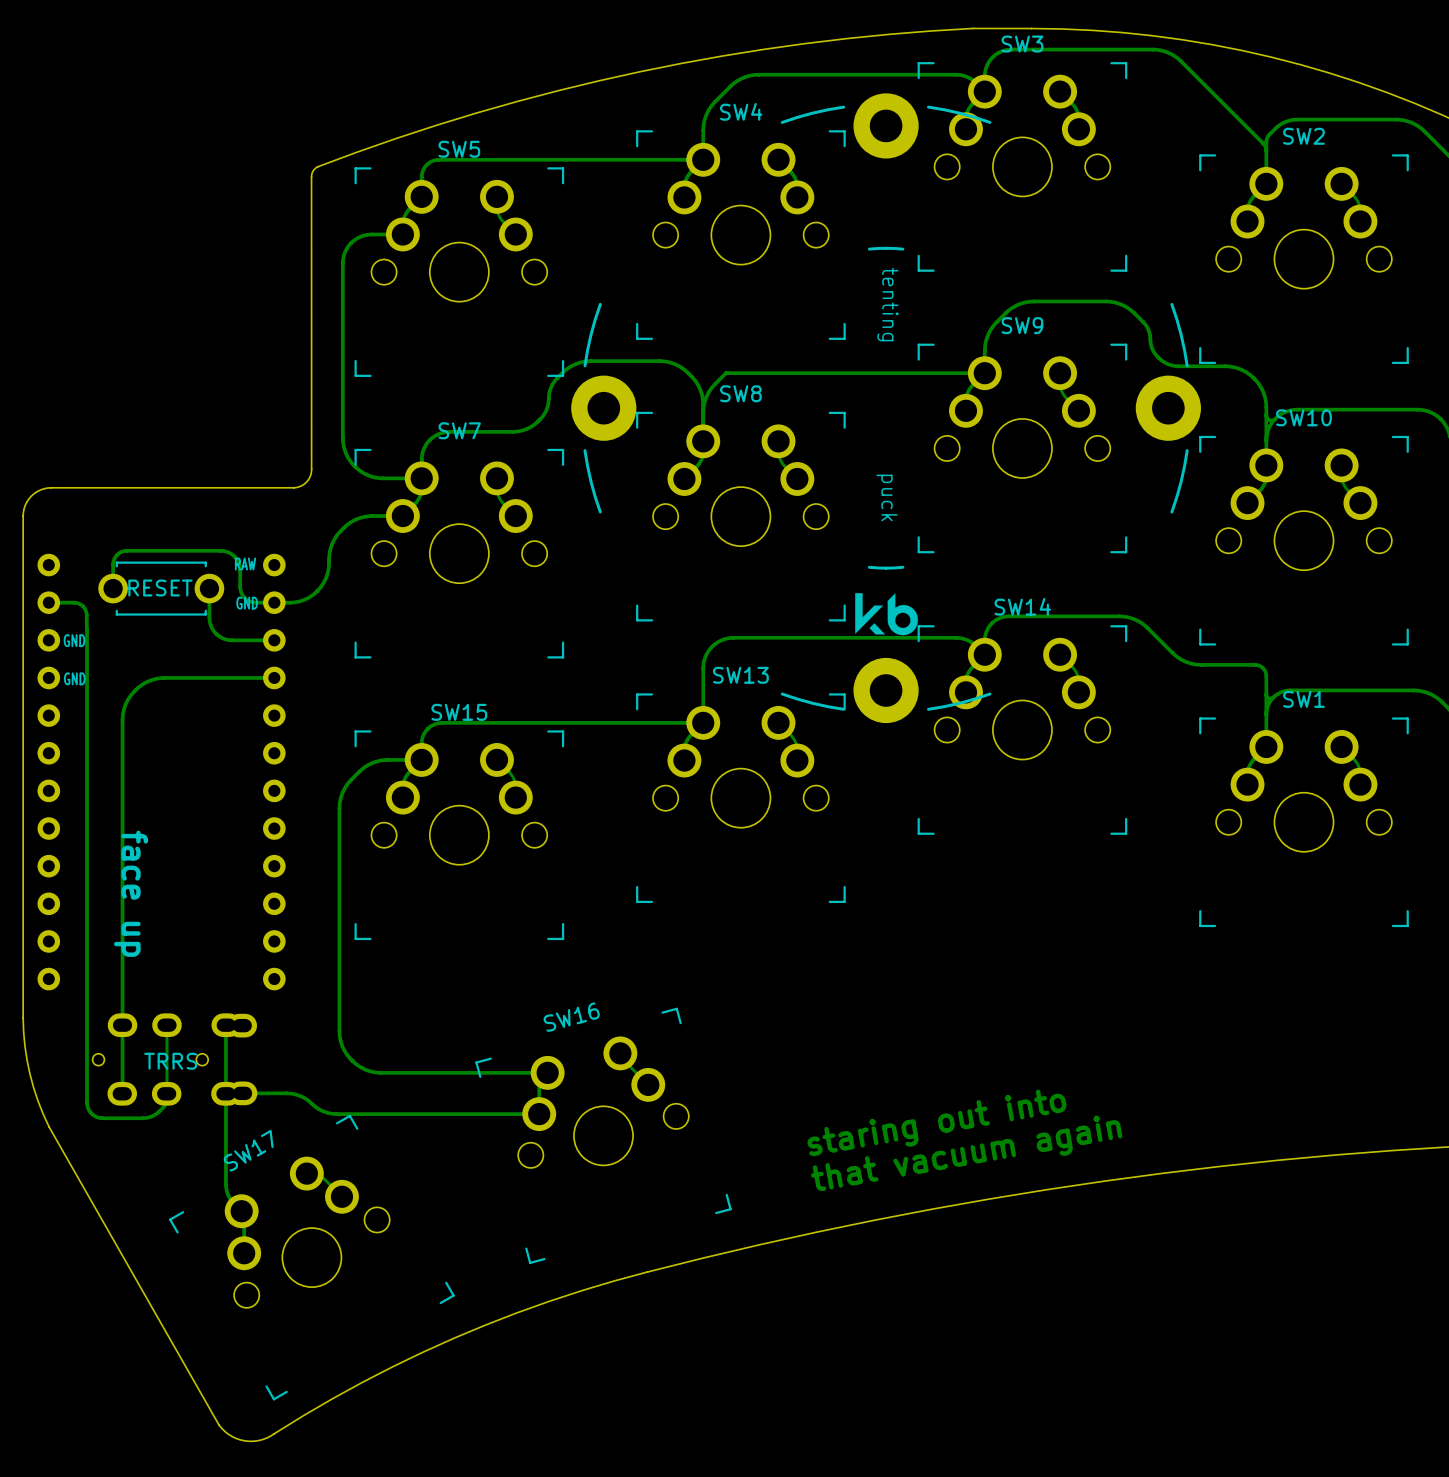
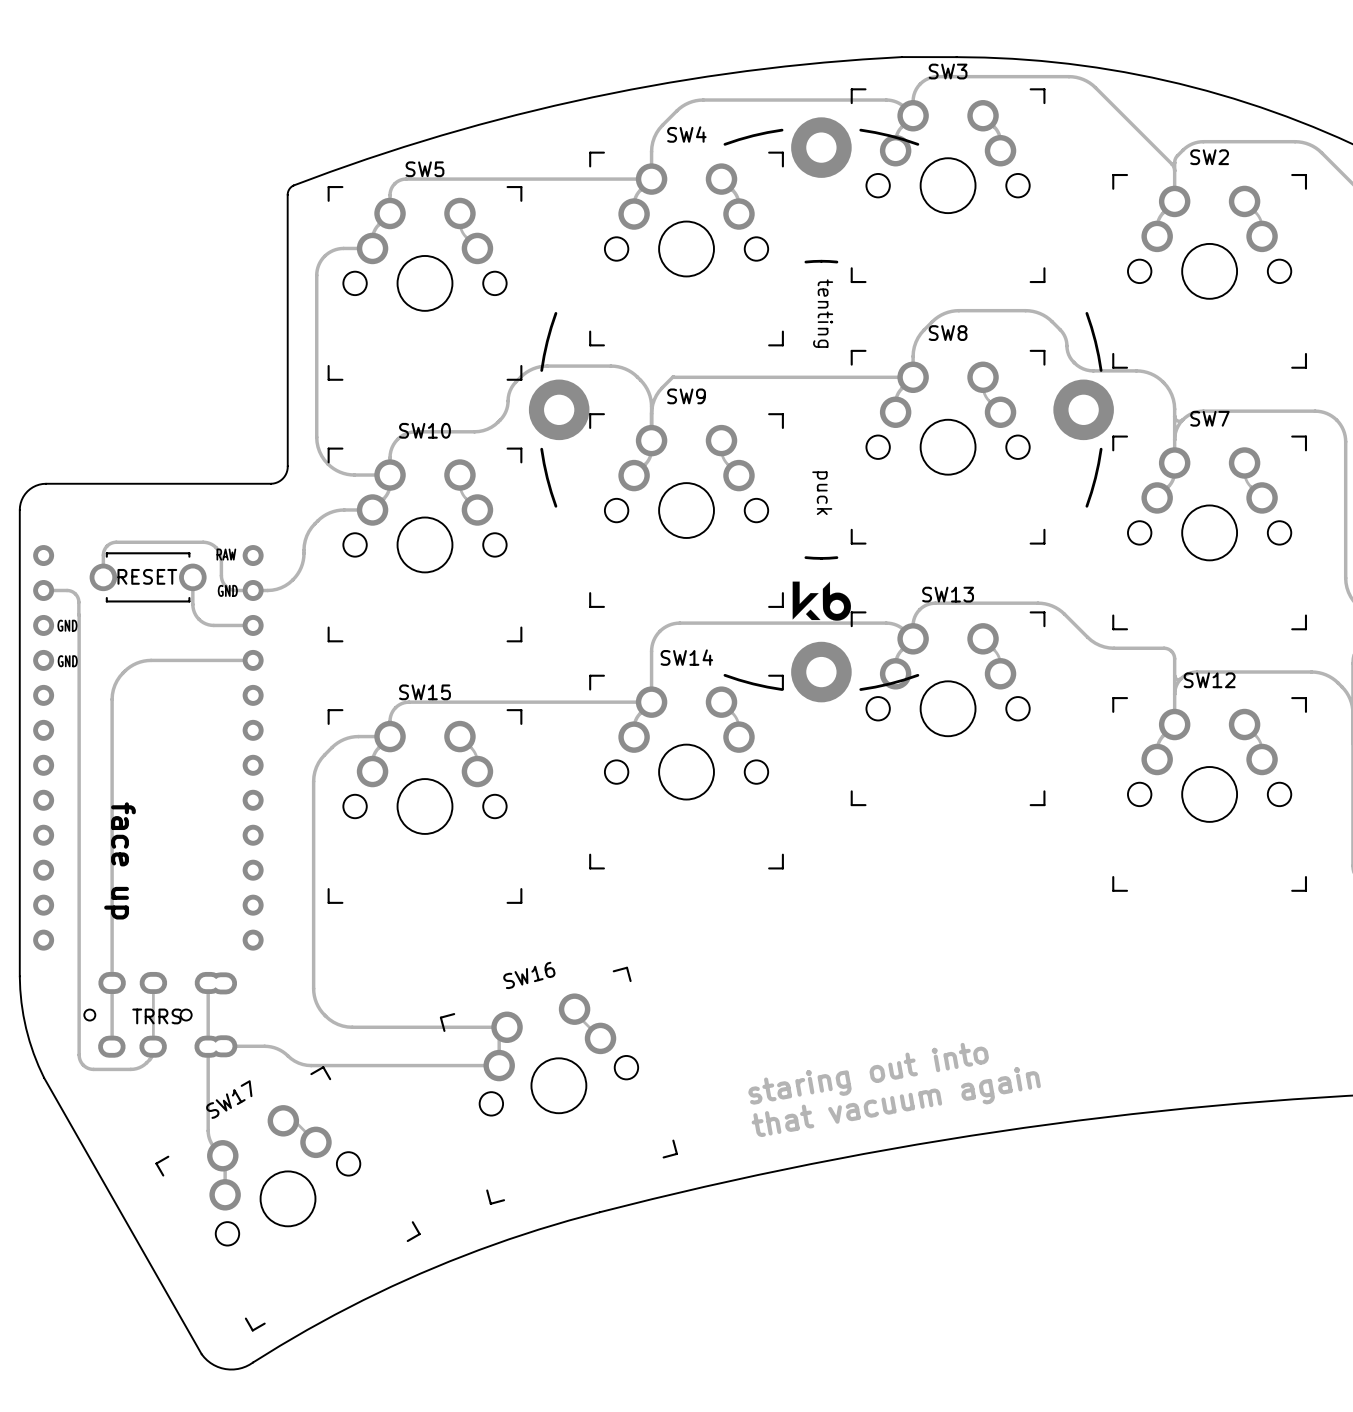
SW9 name: SW9 (1022, 325) -> SW8 (948, 333)
SW8 name: SW8 (740, 393) -> SW9 (686, 396)
SW10 name: SW10 (1303, 417) -> SW7 (1209, 418)
SW7 name: SW7 (459, 430) -> SW10 (424, 430)
SW14 name: SW14 (1022, 606) -> SW13 (948, 594)
SW13 name: SW13 (740, 675) -> SW14 (686, 657)
SW1 name: SW1 (1303, 699) -> SW12 (1209, 680)

